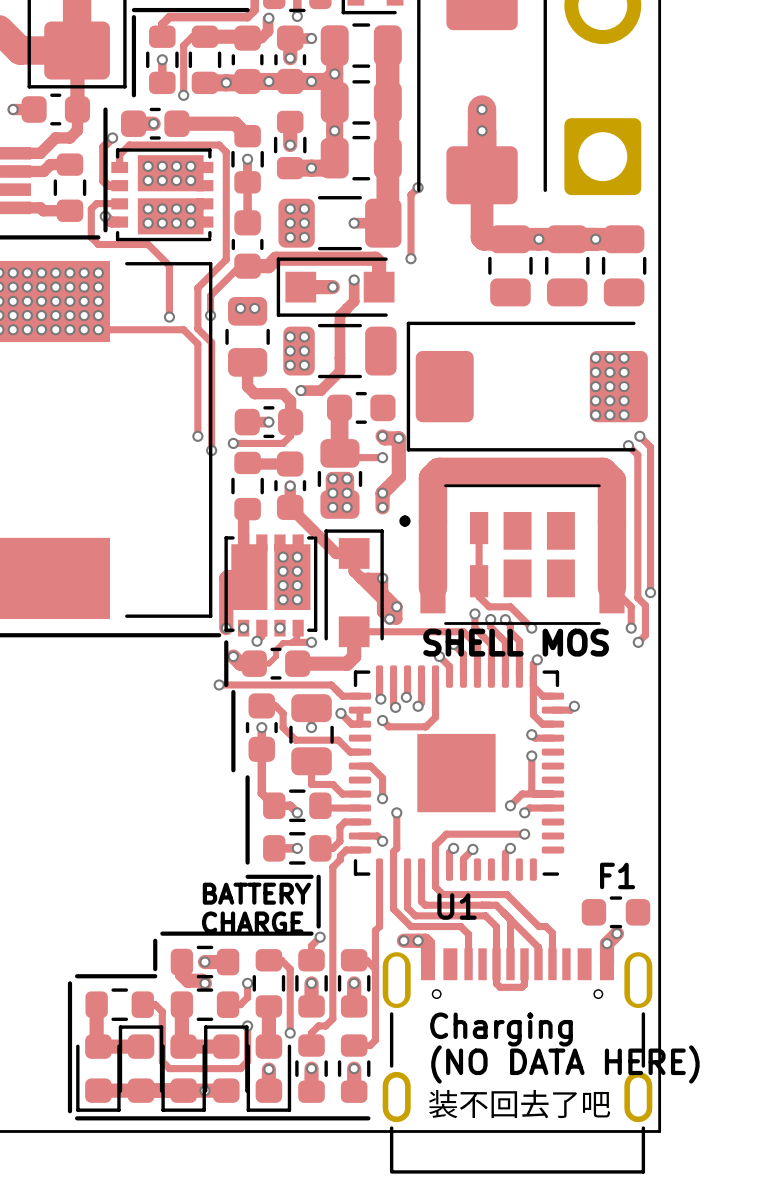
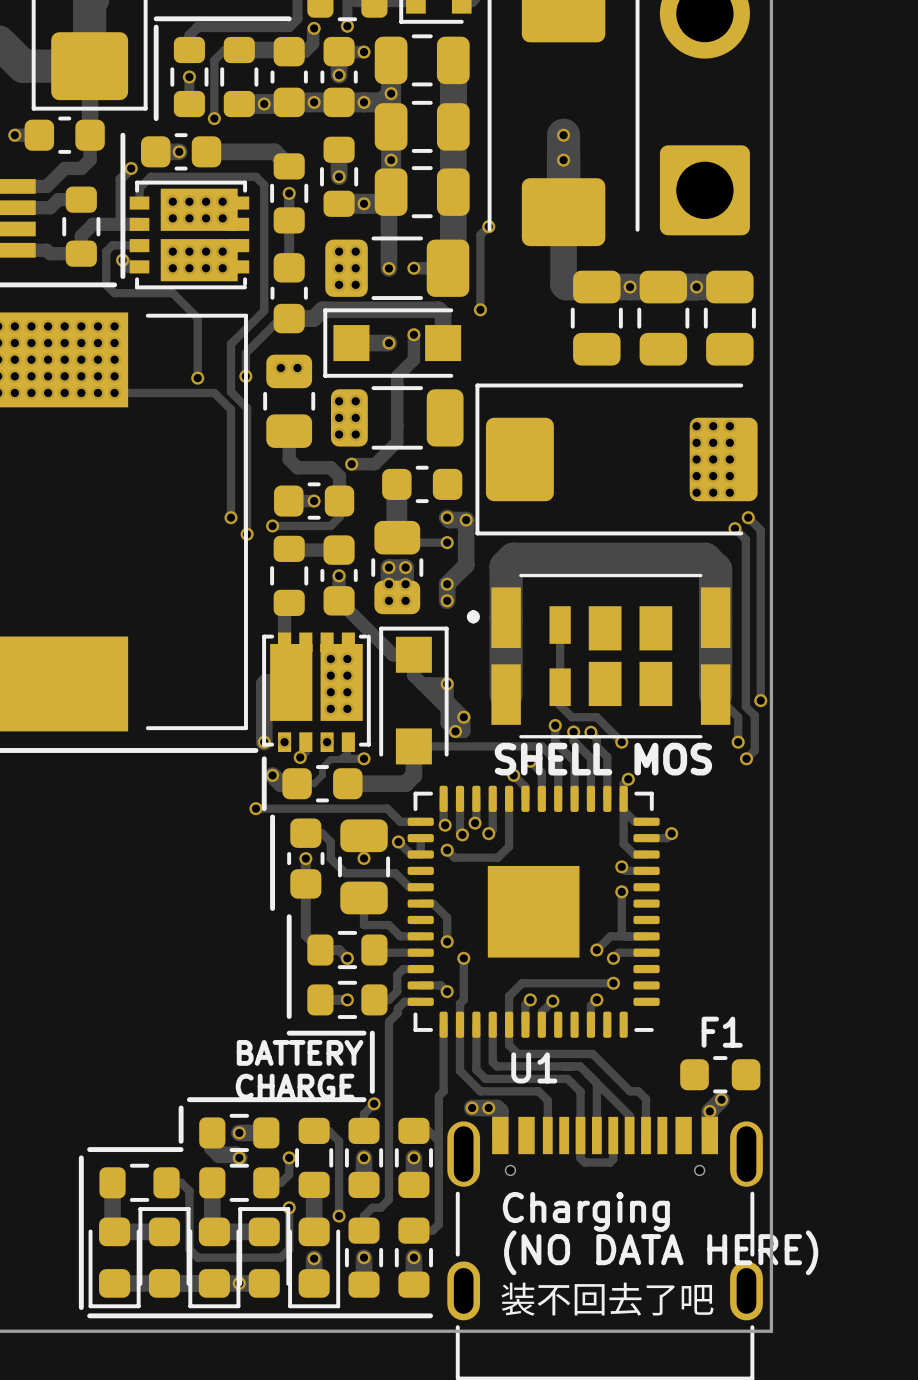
track: none -> (391, 192) (388, 194) (388, 268)
track: none -> (139, 224) (93, 224) (81, 236) (81, 253)
via: none -> (388, 268)

